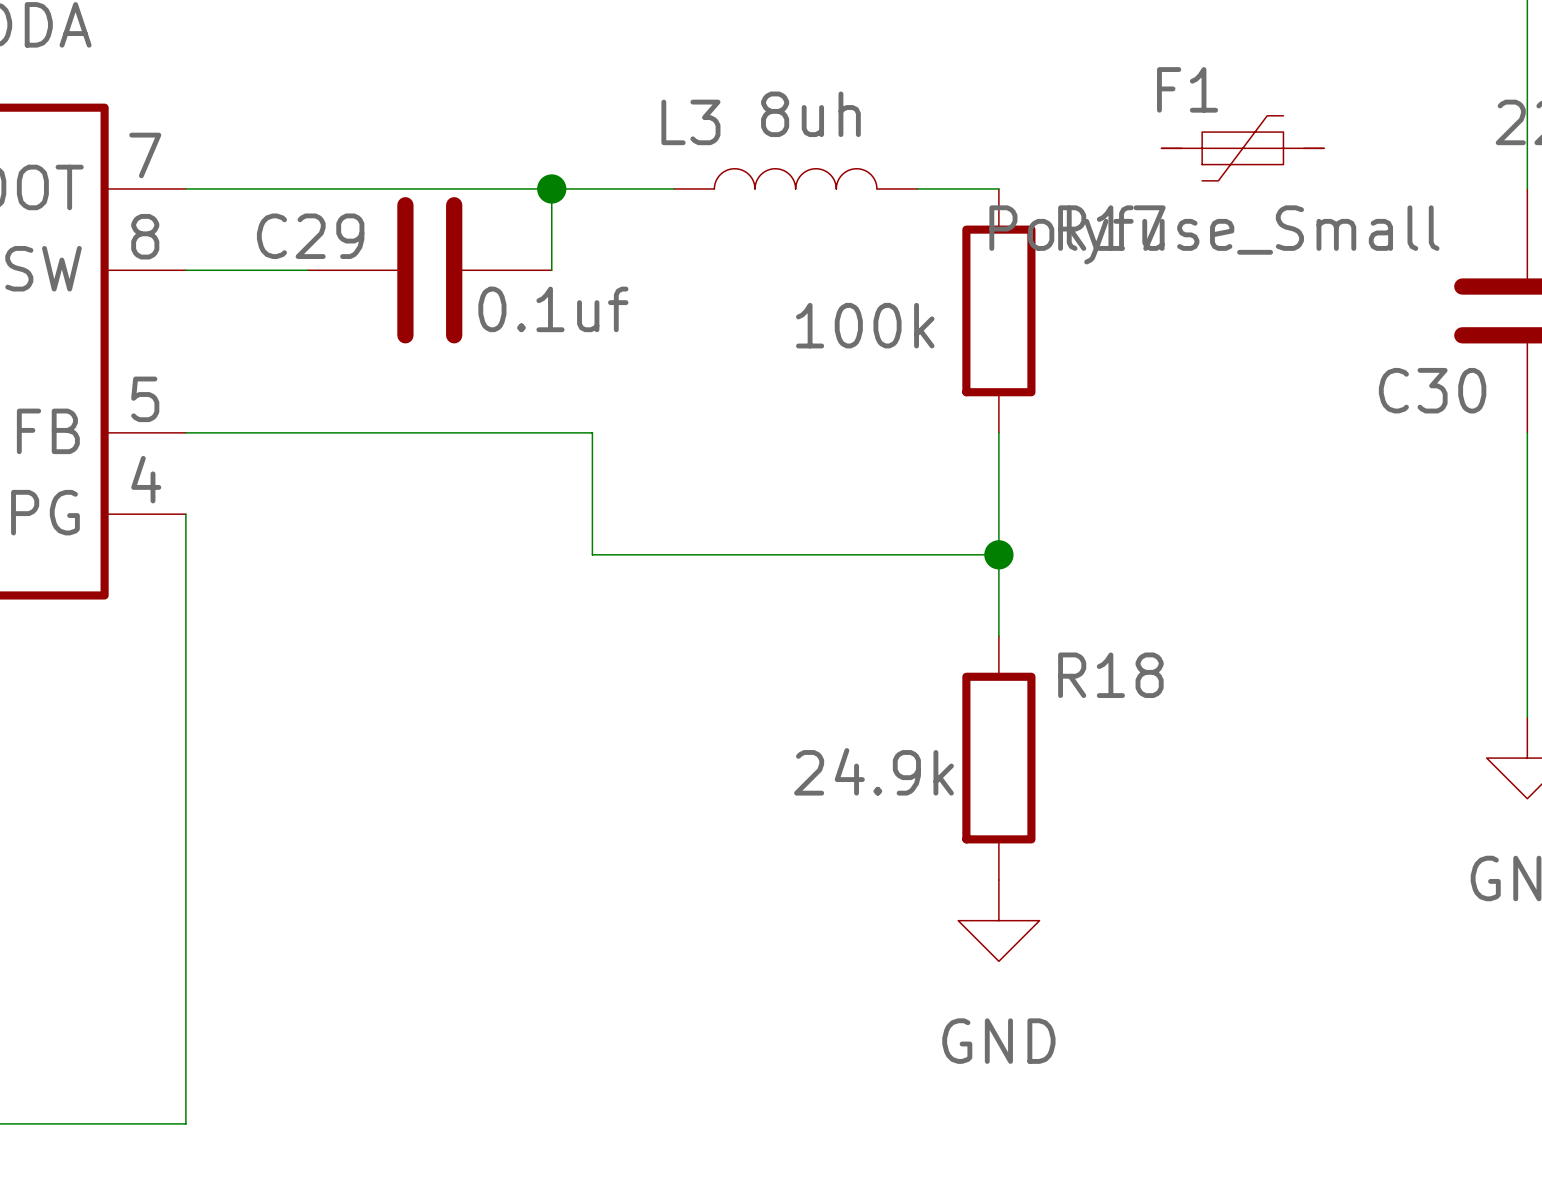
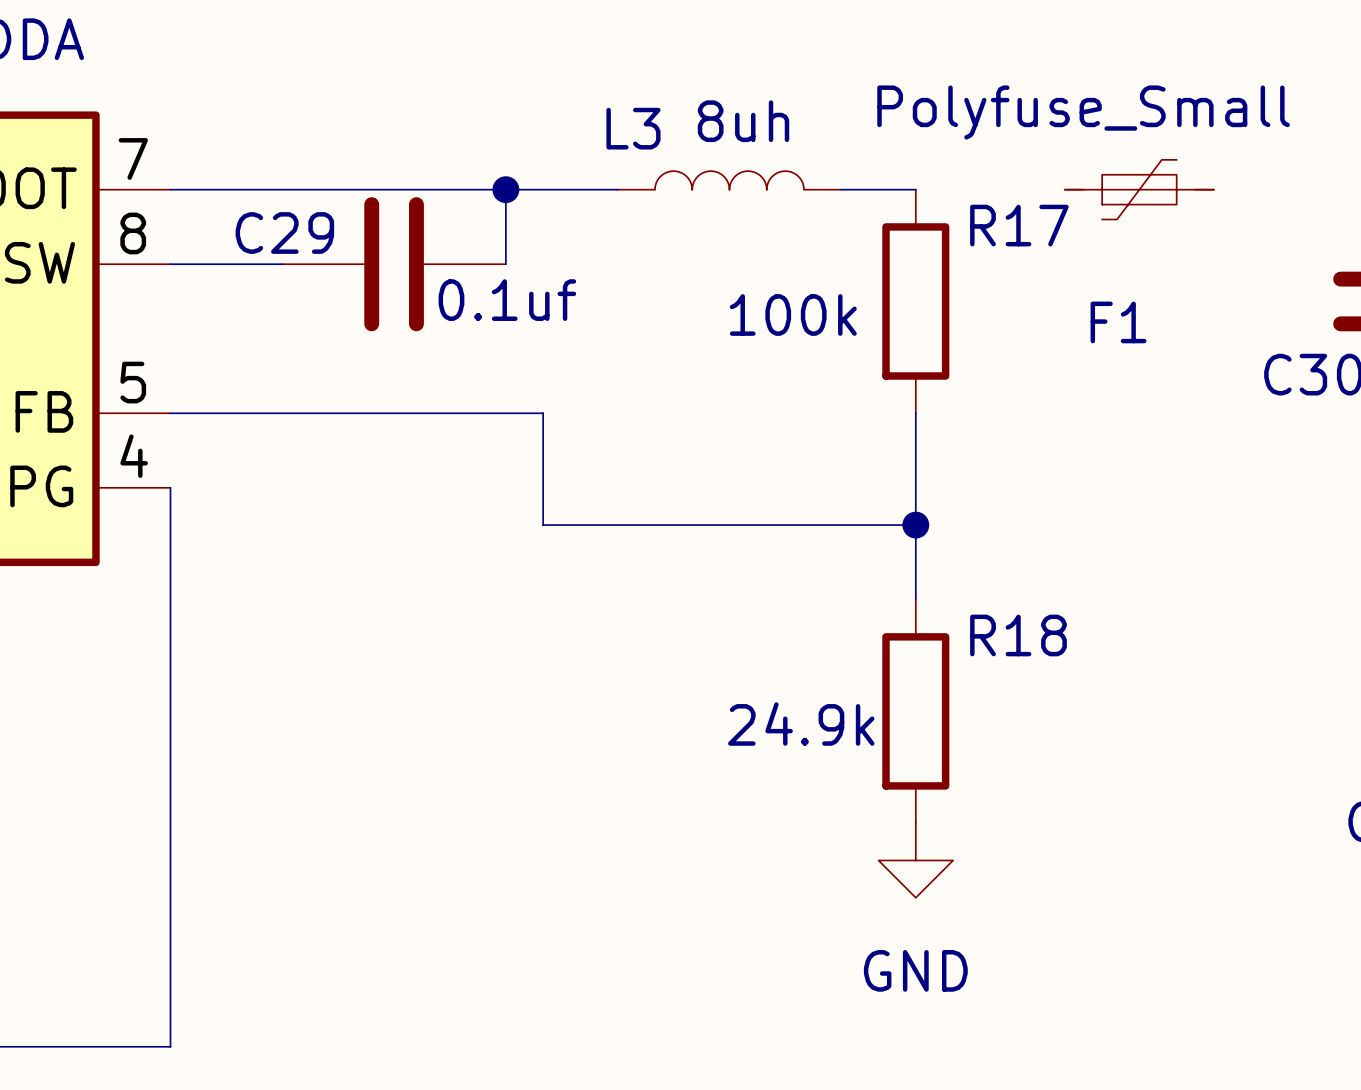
F1 name position: F1 (1187, 89) -> F1 (1118, 322)
F1 position: (1242, 148) -> (1139, 189)
F1 value position: Polyfuse_Small (1214, 234) -> Polyfuse_Small (1083, 112)

